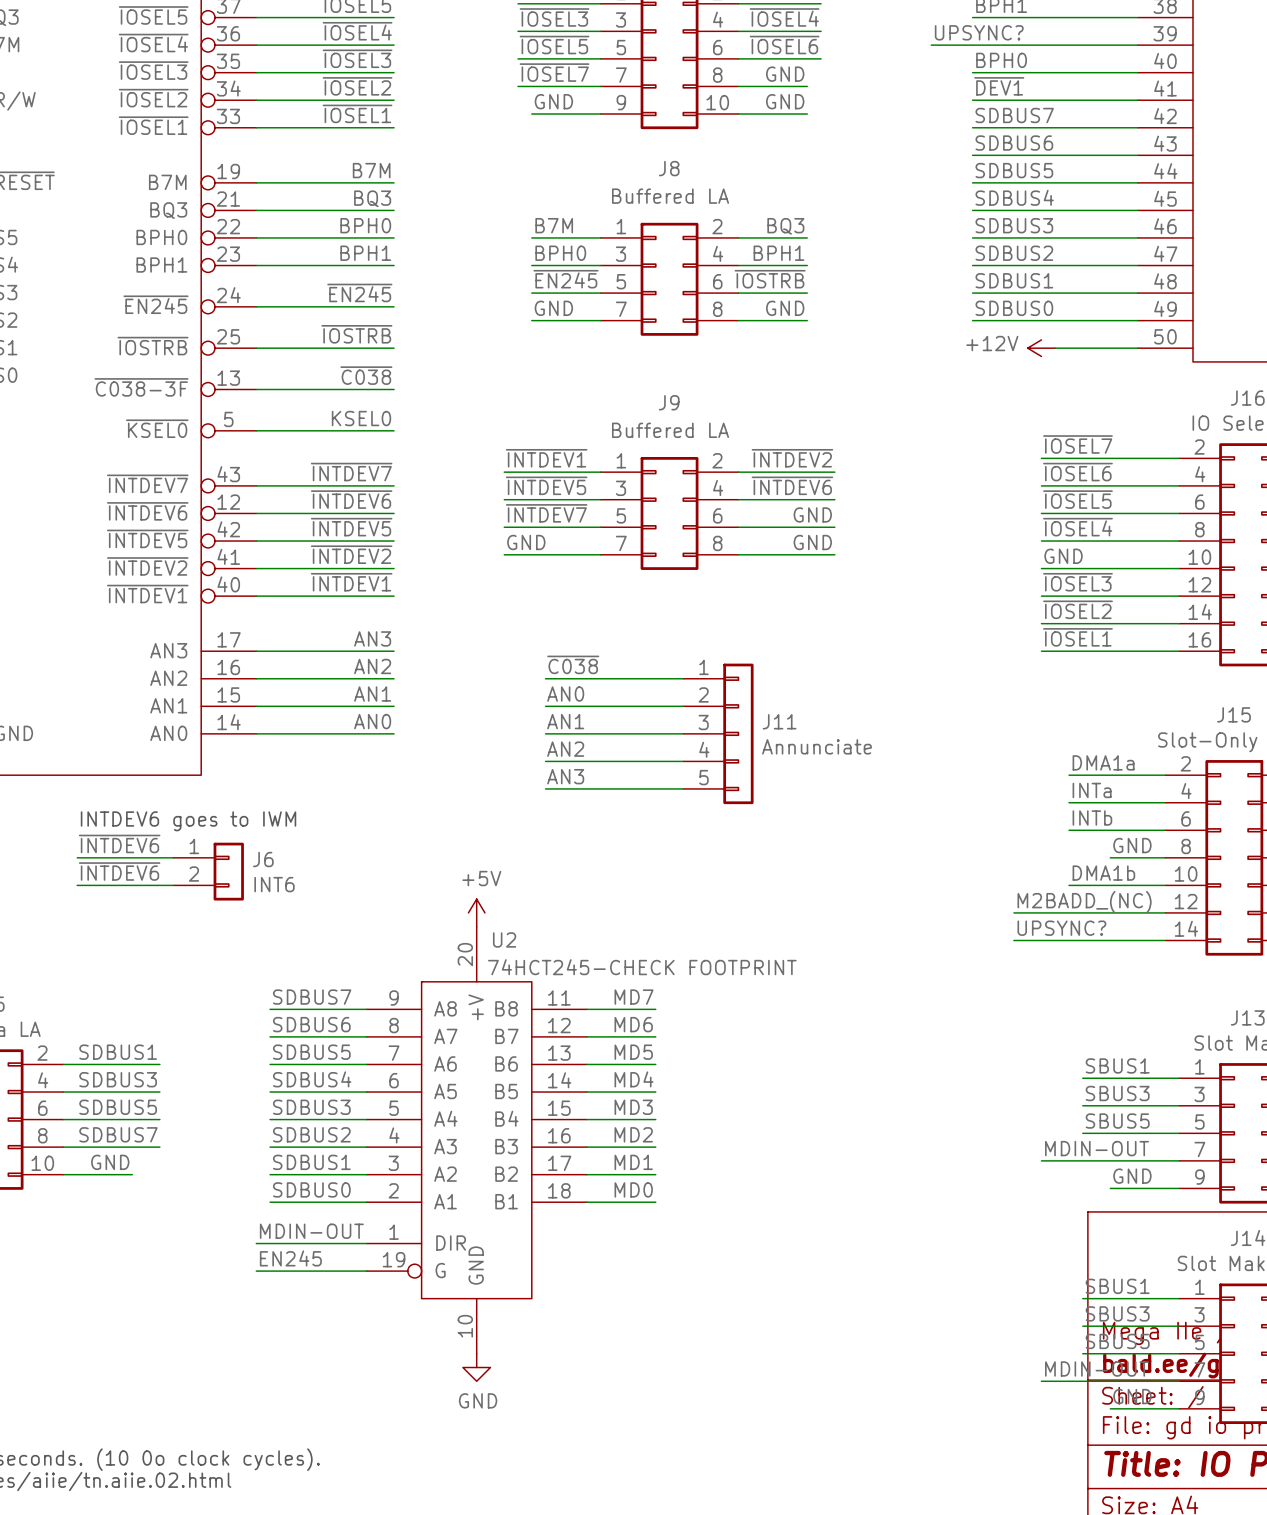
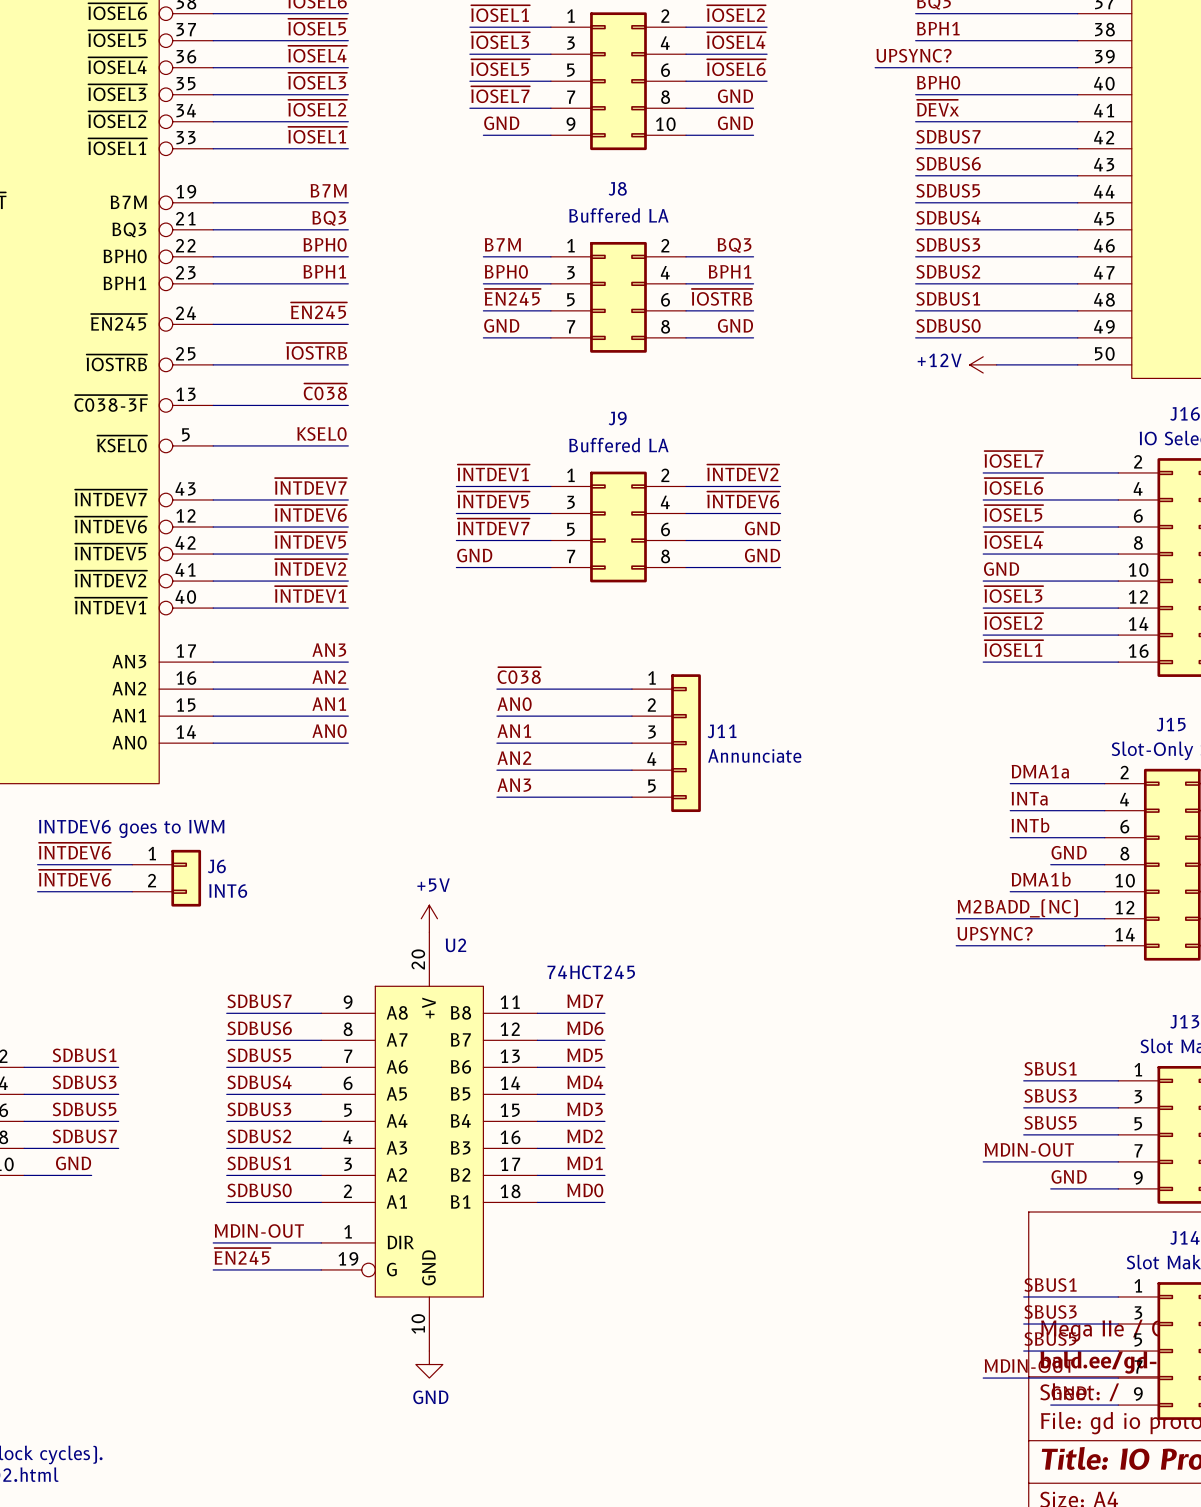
label: ~{DEV1} (999, 86) -> ~{DEVx} (938, 108)
U2 value: 74HCT245-CHECK FOOTPRINT (642, 967) -> 74HCT245 (591, 972)
label: EN245 (290, 1258) -> ~{EN245} (242, 1256)

